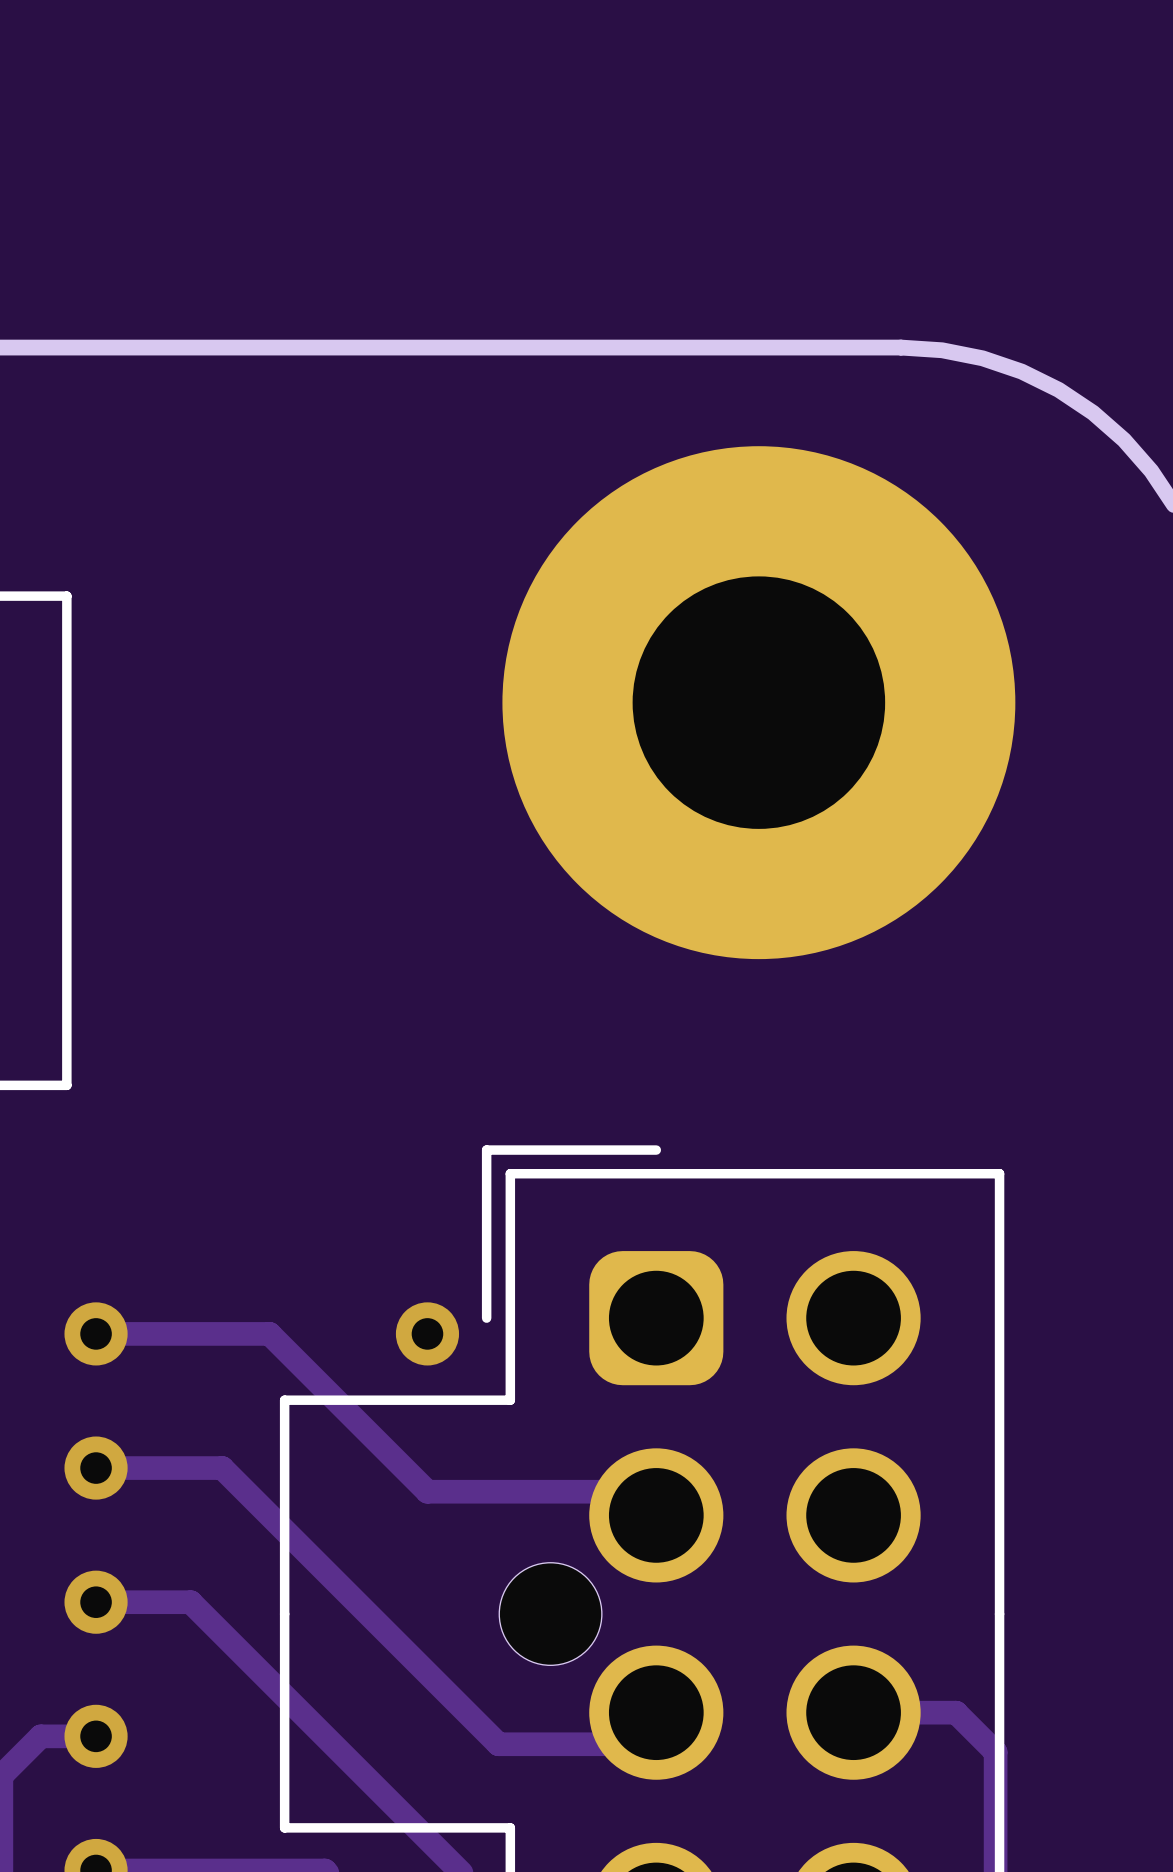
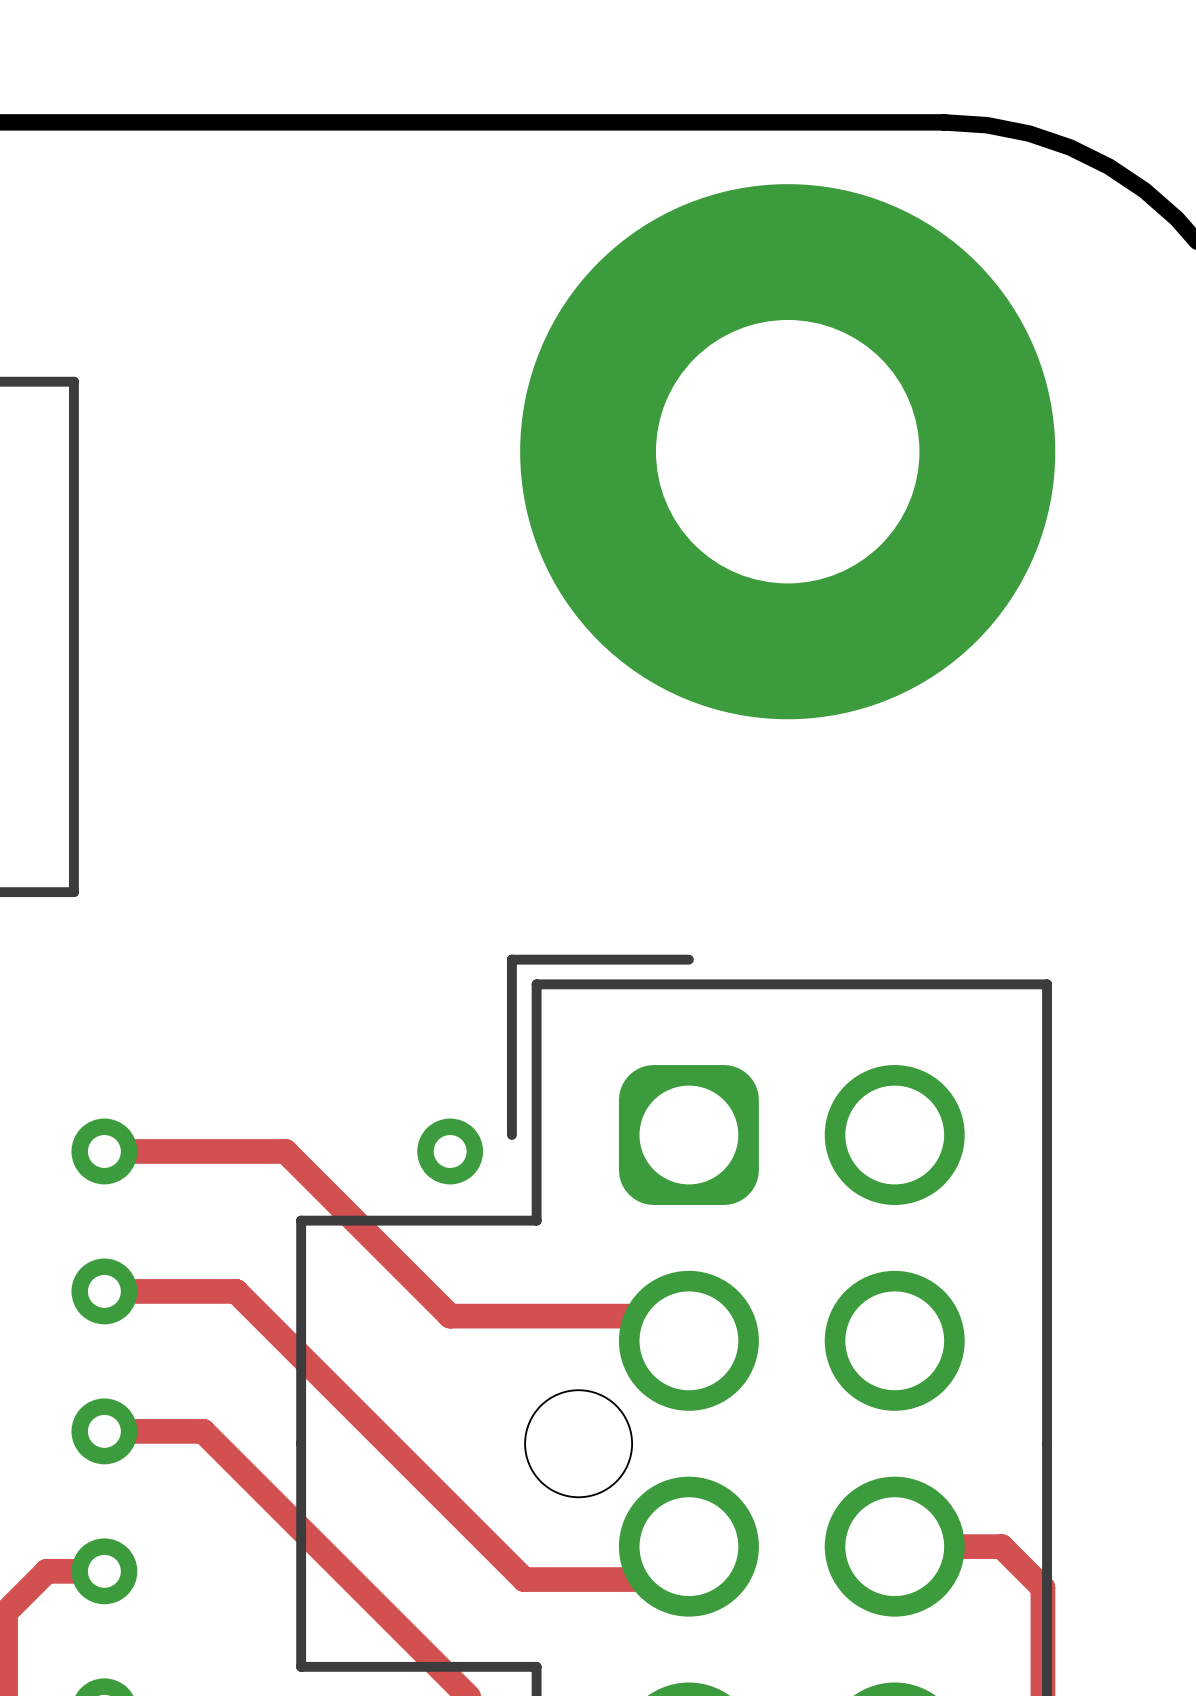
part position: (758, 702) -> (787, 451)

